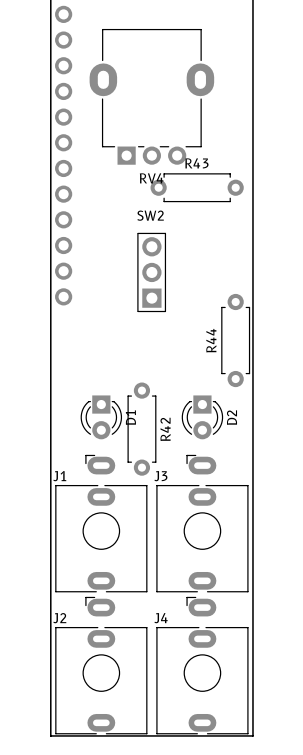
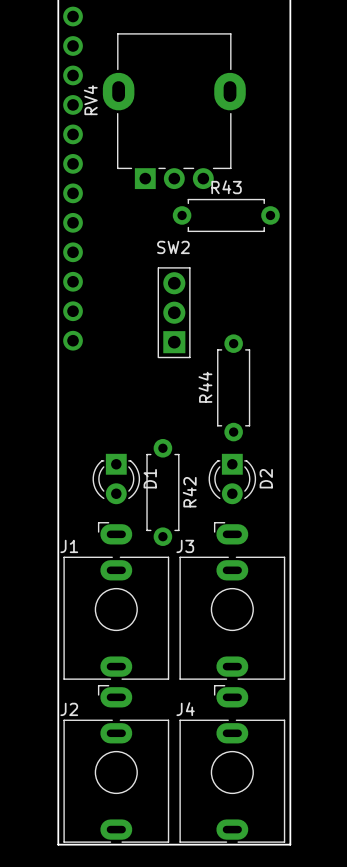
RV4 name rotation: 0° (151, 178) -> 90° counterclockwise (90, 100)
RV4 name position: RV4 (151, 178) -> RV4 (90, 100)
R44 position: (235, 340) -> (233, 387)

